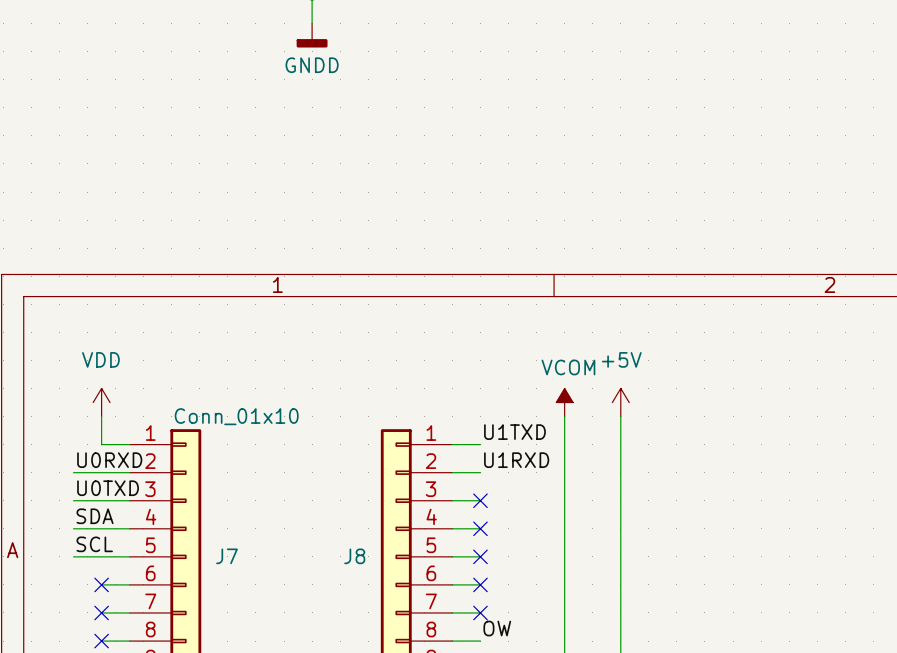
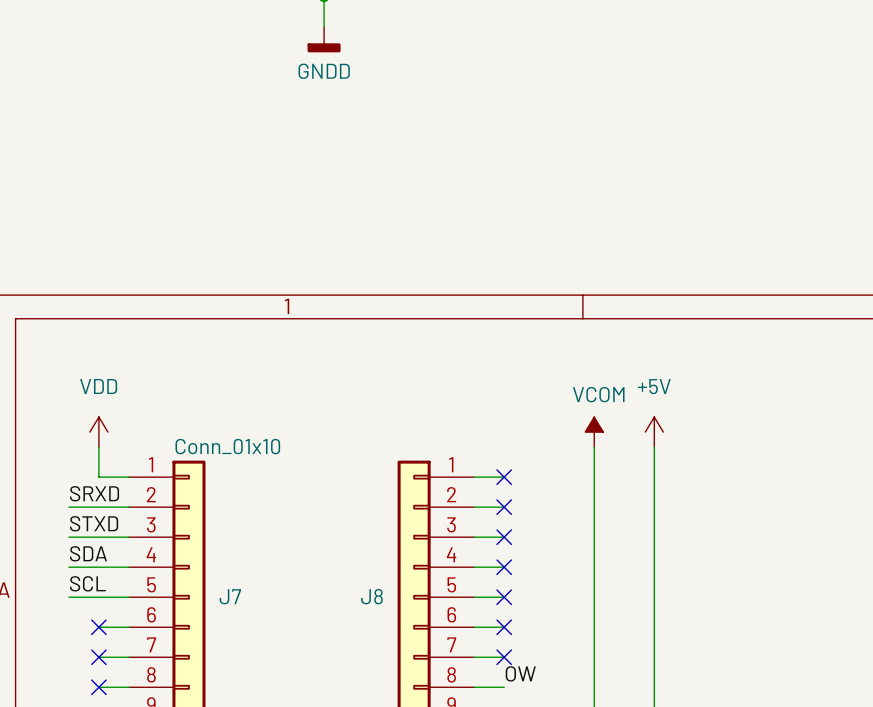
label: U1TXD (514, 432) -> none
no-connect mark: none -> (504, 477)
label: U0RXD (109, 460) -> SRXD (94, 493)
label: U1RXD (516, 460) -> none
no-connect mark: none -> (504, 507)
label: U0TXD (108, 488) -> STXD (94, 523)

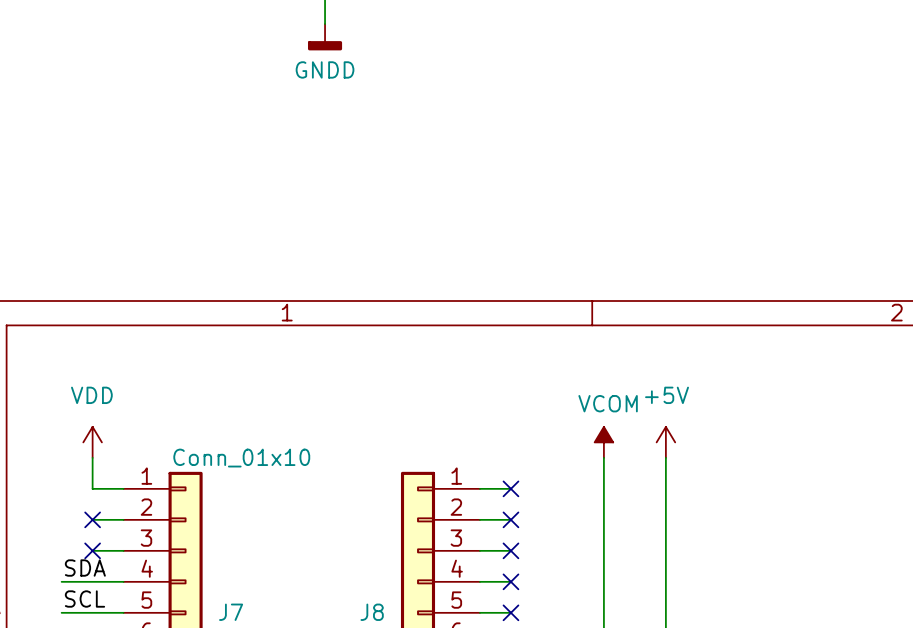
label: SRXD (94, 493) -> none
wire: (68, 507) (98, 507) -> none
no-connect mark: none -> (92, 519)
label: STXD (94, 523) -> none
wire: (68, 537) (98, 537) -> none
no-connect mark: none -> (92, 550)

